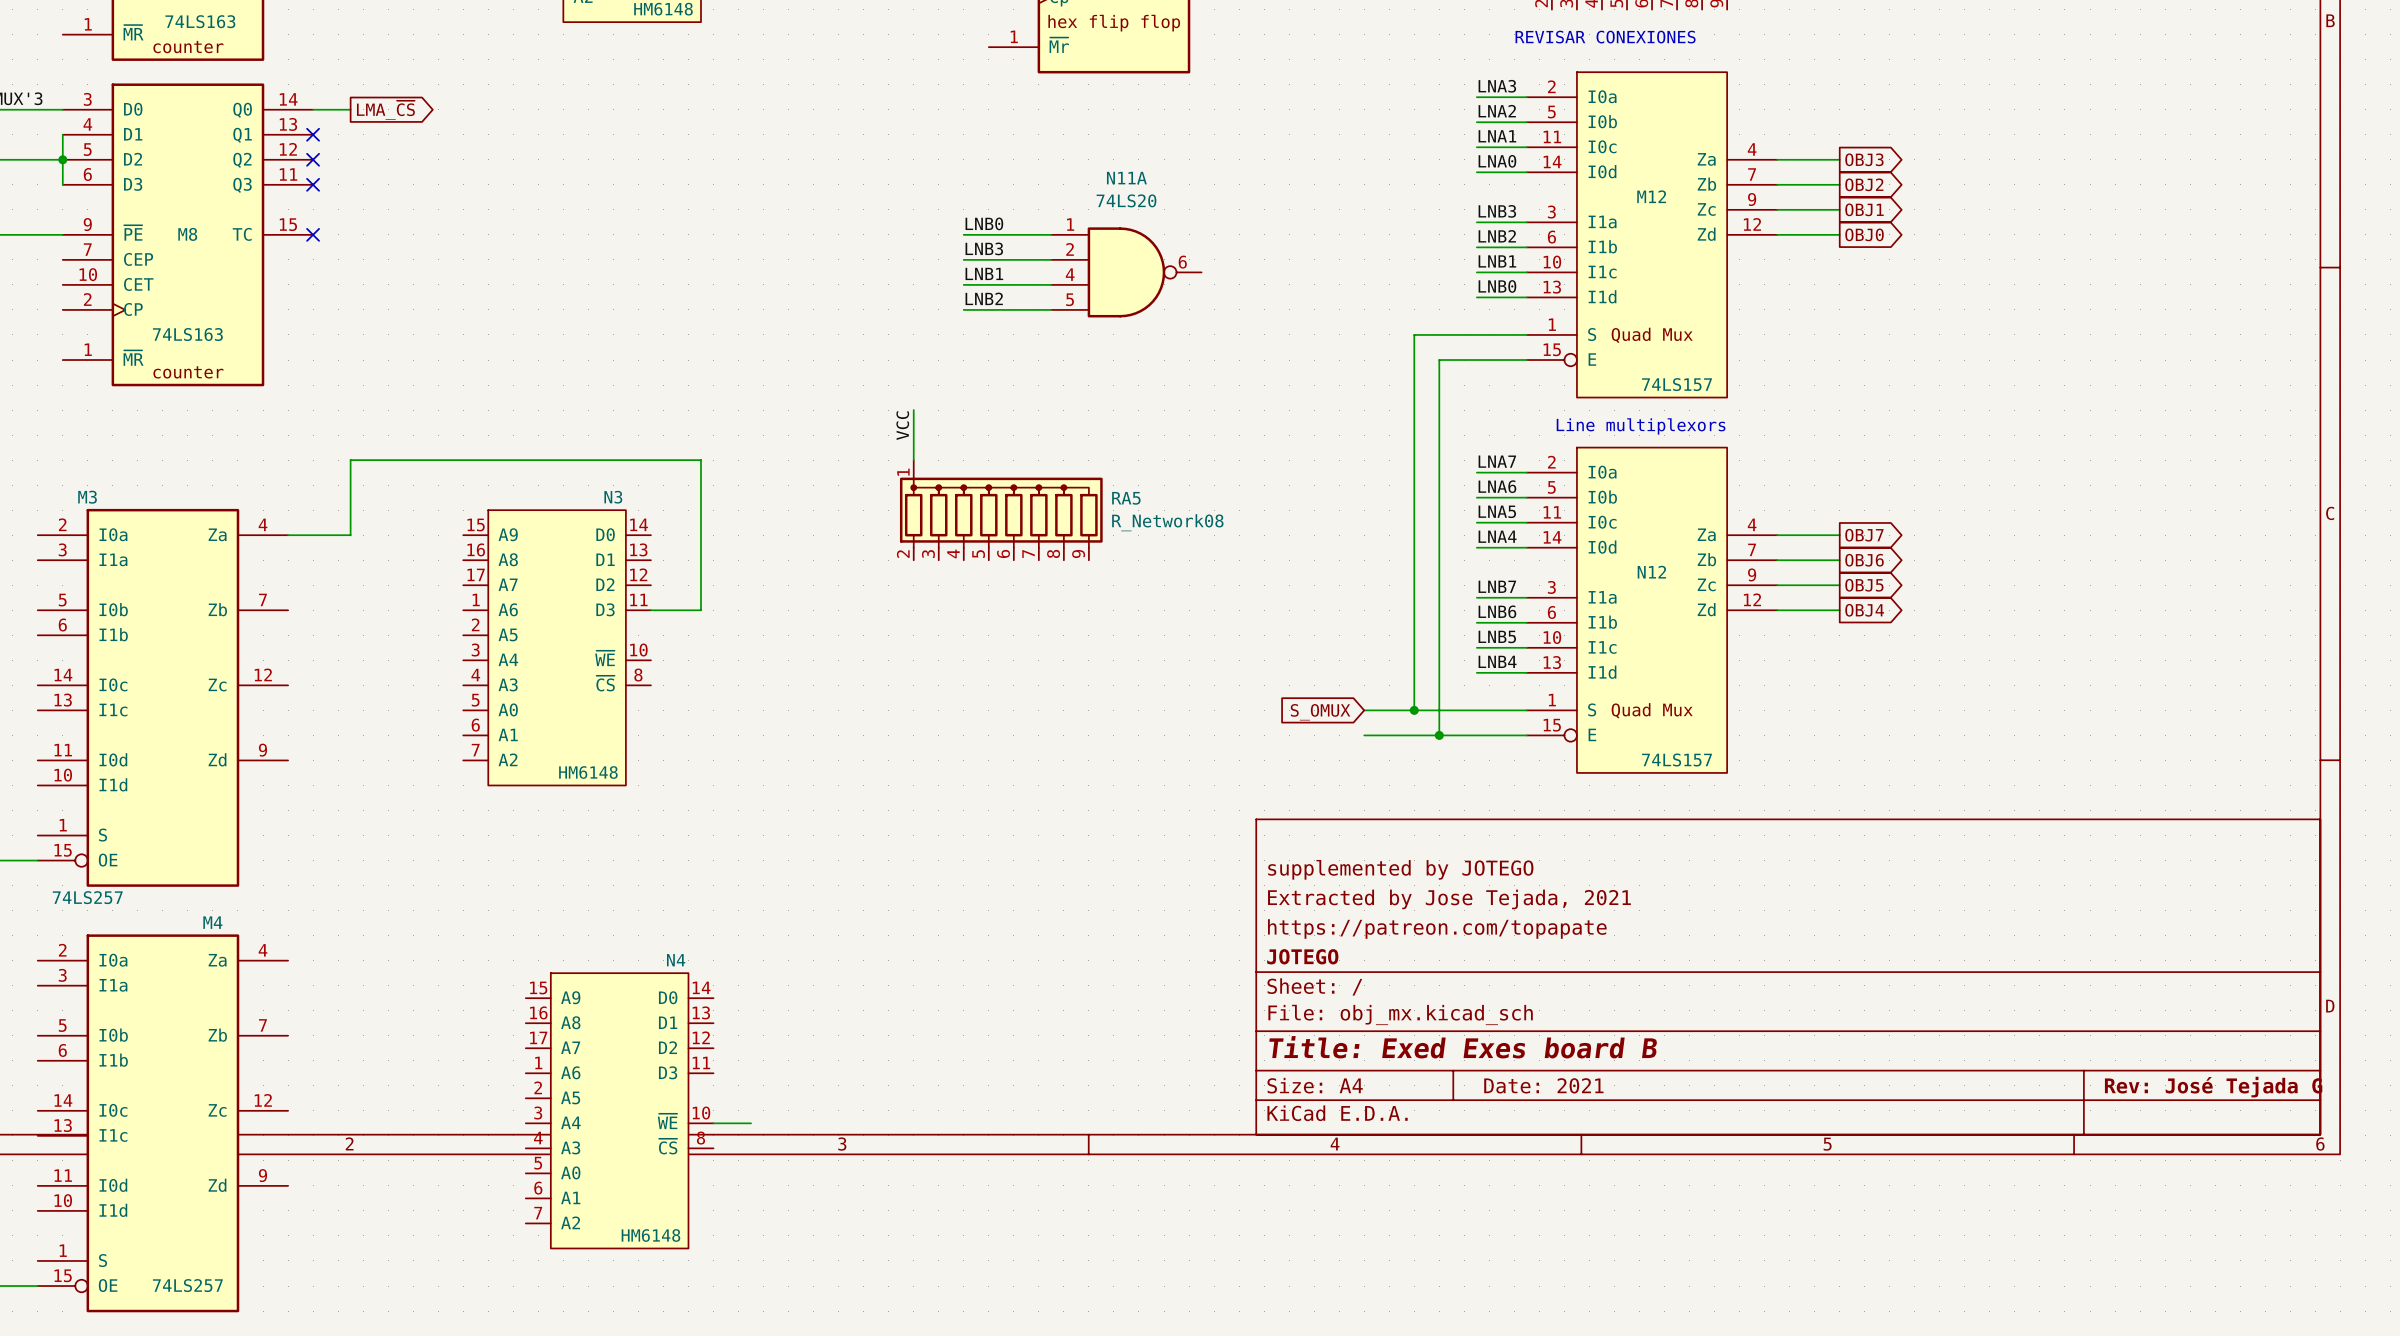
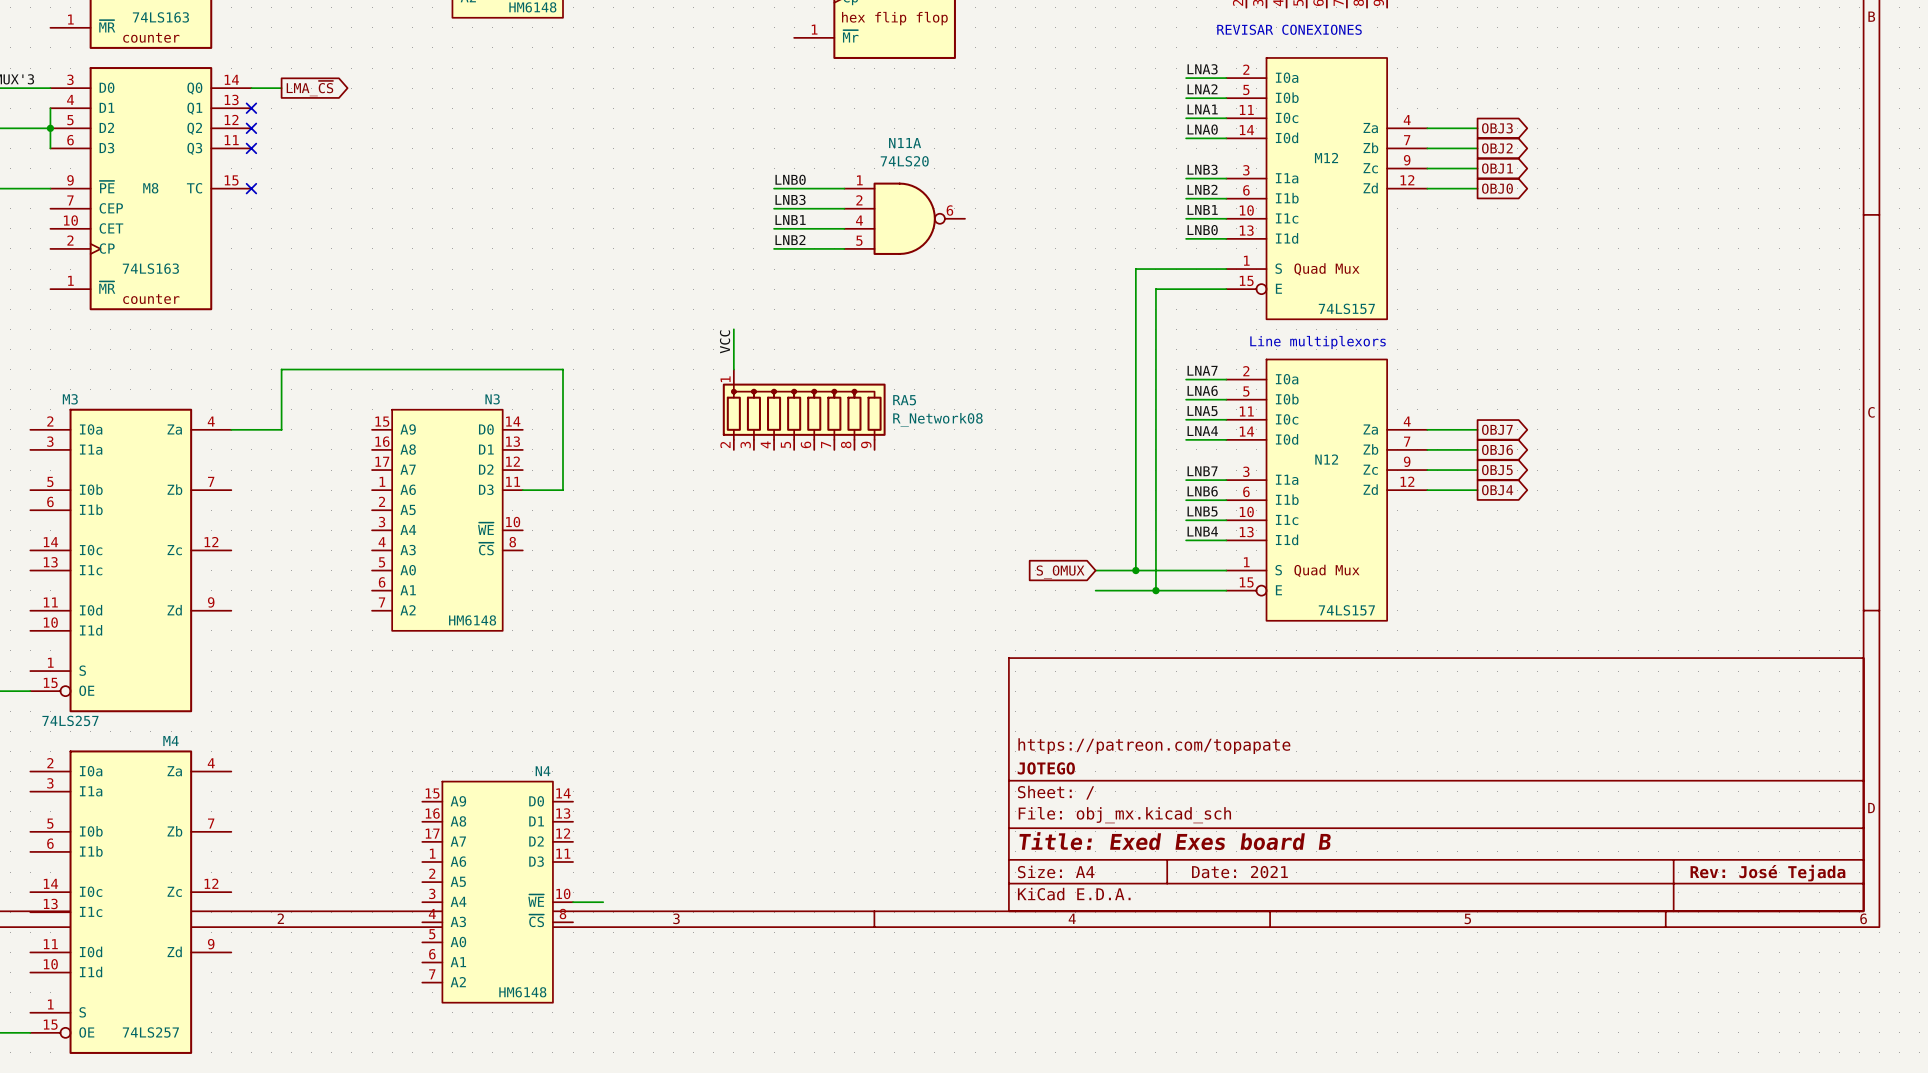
title block: supplemented by JOTEGO (1400, 869) -> none
title block: Extracted by Jose Tejada, 2021 (1449, 899) -> none
title block: Rev: José Tejada G (2213, 1087) -> Rev: José Tejada (1767, 873)

